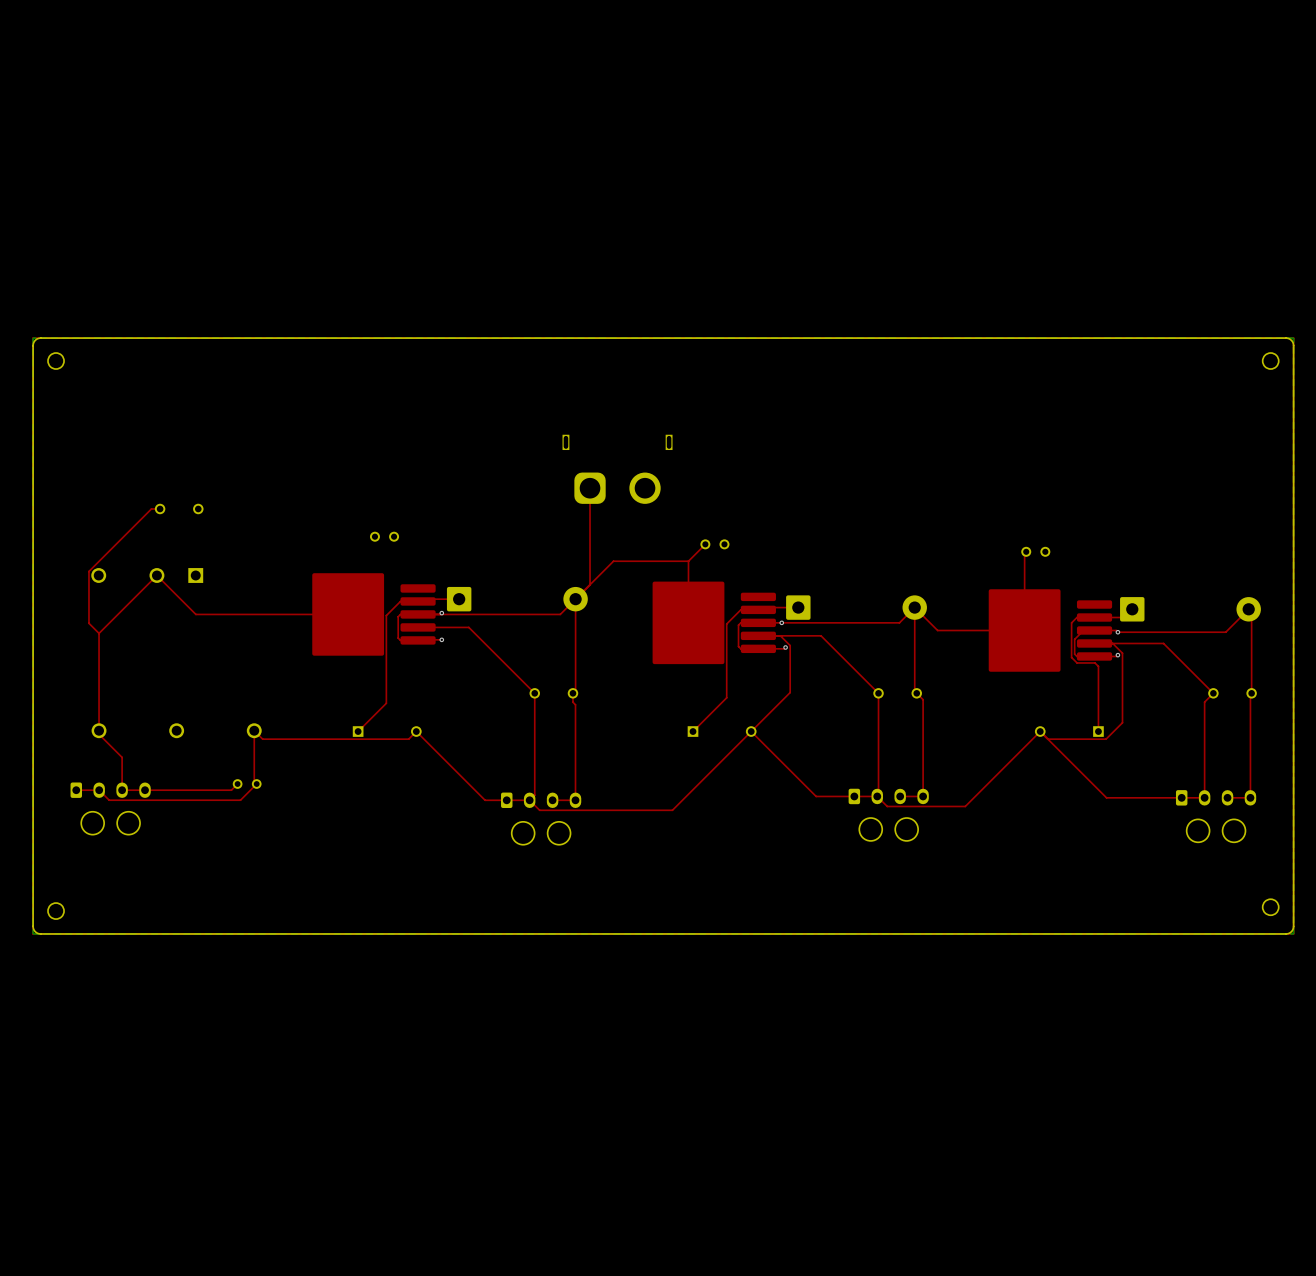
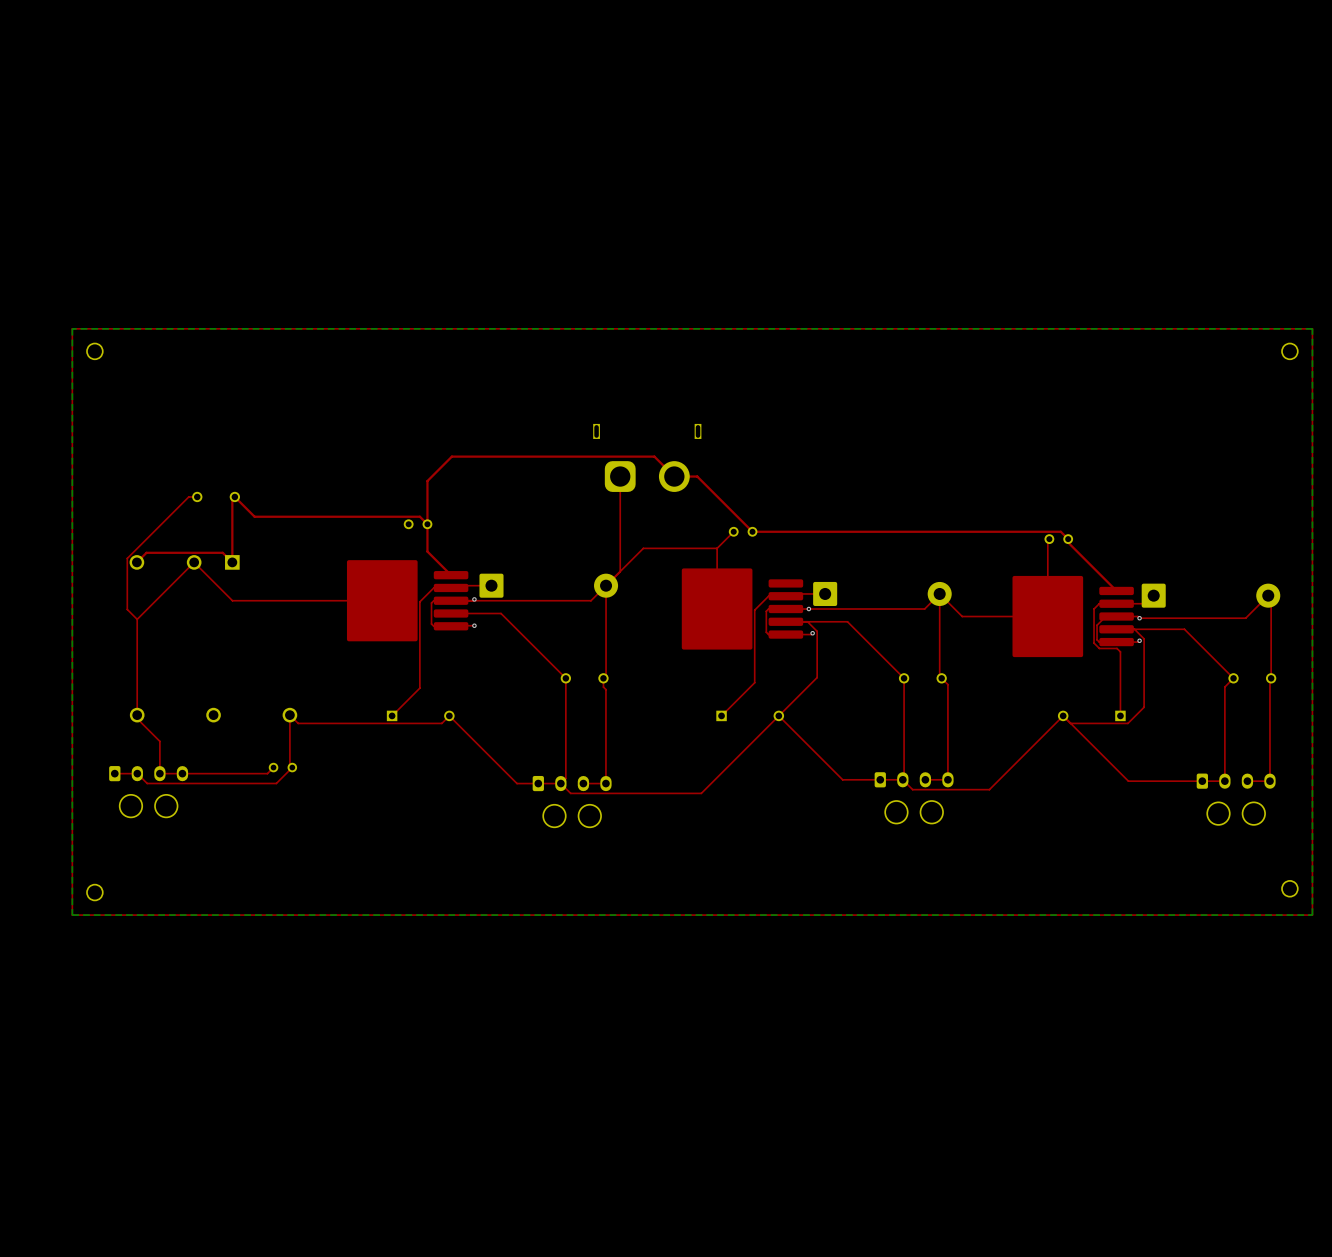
board edge: (1285, 338) (37, 338) (33, 345) (33, 929) (40, 933) (1289, 933) (1293, 926) (1293, 345) (1291, 340) (1285, 338) -> none
top track: none -> (234, 496) (254, 516) (419, 516) (427, 524)
top track: none -> (232, 499) (232, 562) (222, 552) (146, 552) (136, 562)
top track: none -> (1068, 539) (1060, 531) (752, 531) (697, 476) (674, 476) (654, 456) (451, 456) (427, 481) (427, 551) (451, 575)
top track: none -> (1068, 542) (1116, 590)

